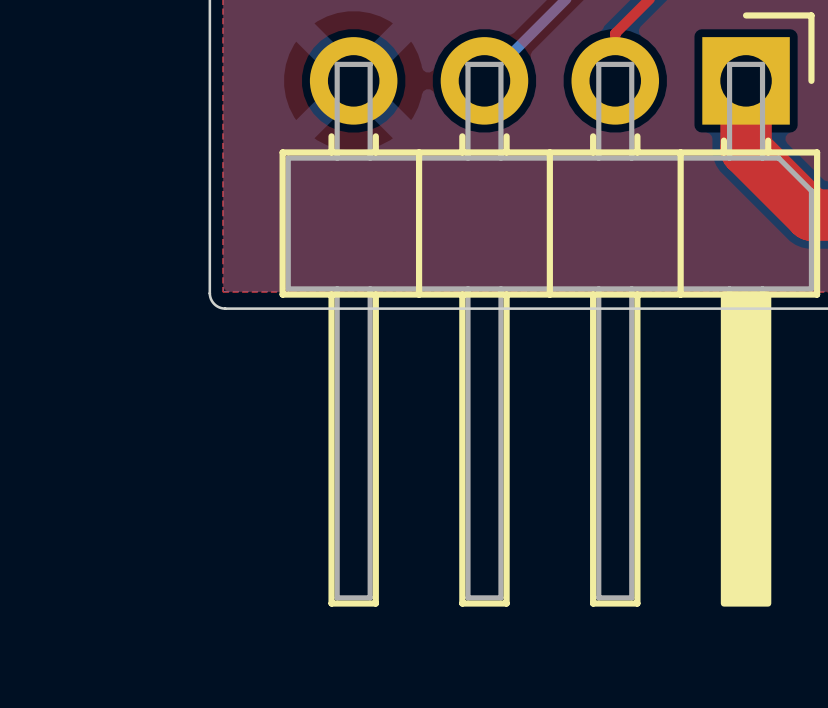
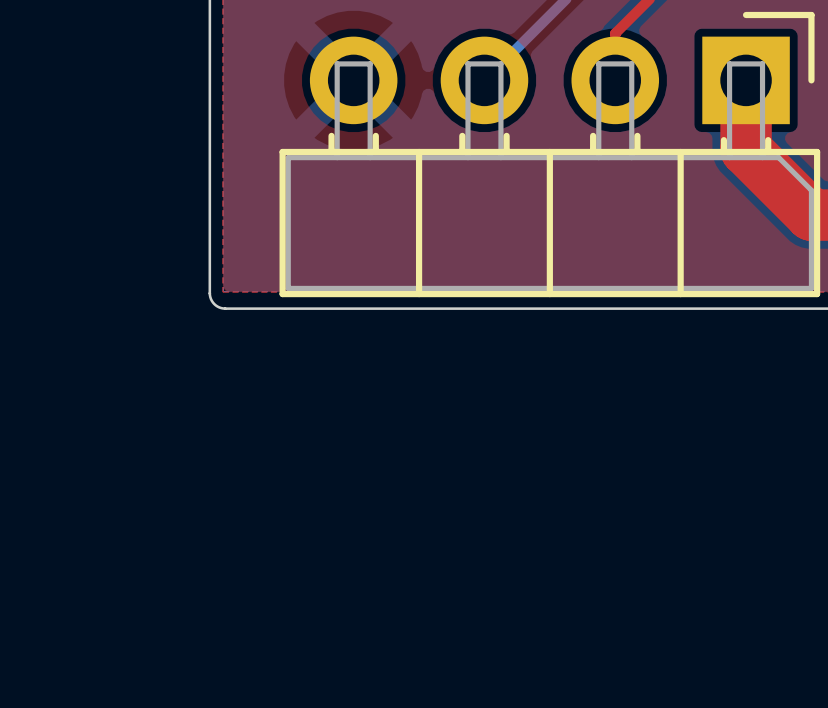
part: none -> (549, 154)
part: (549, 309) -> none

